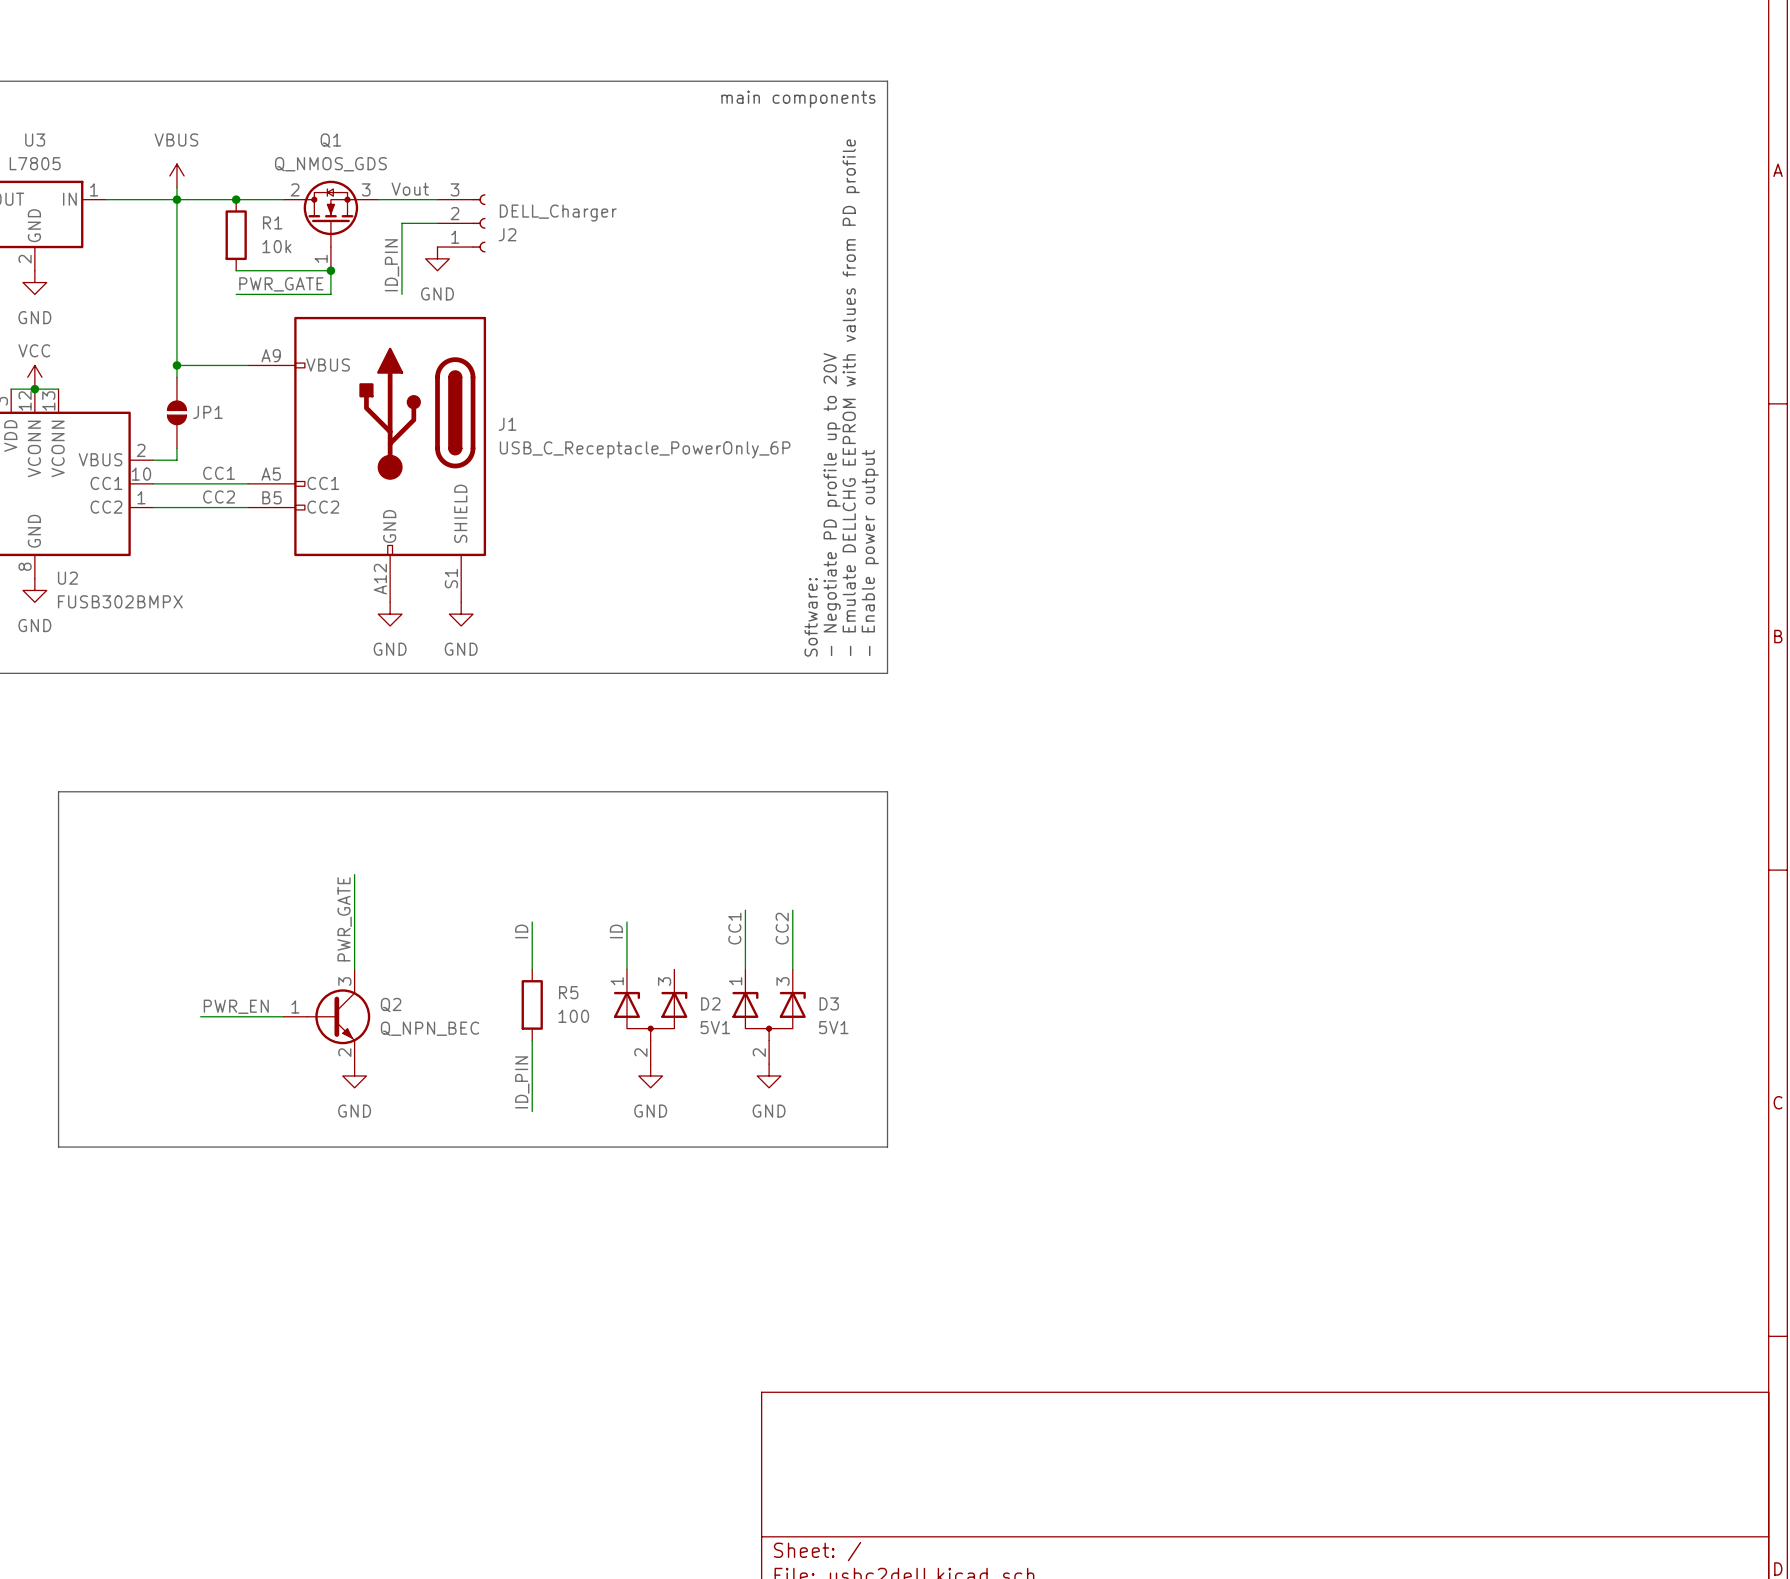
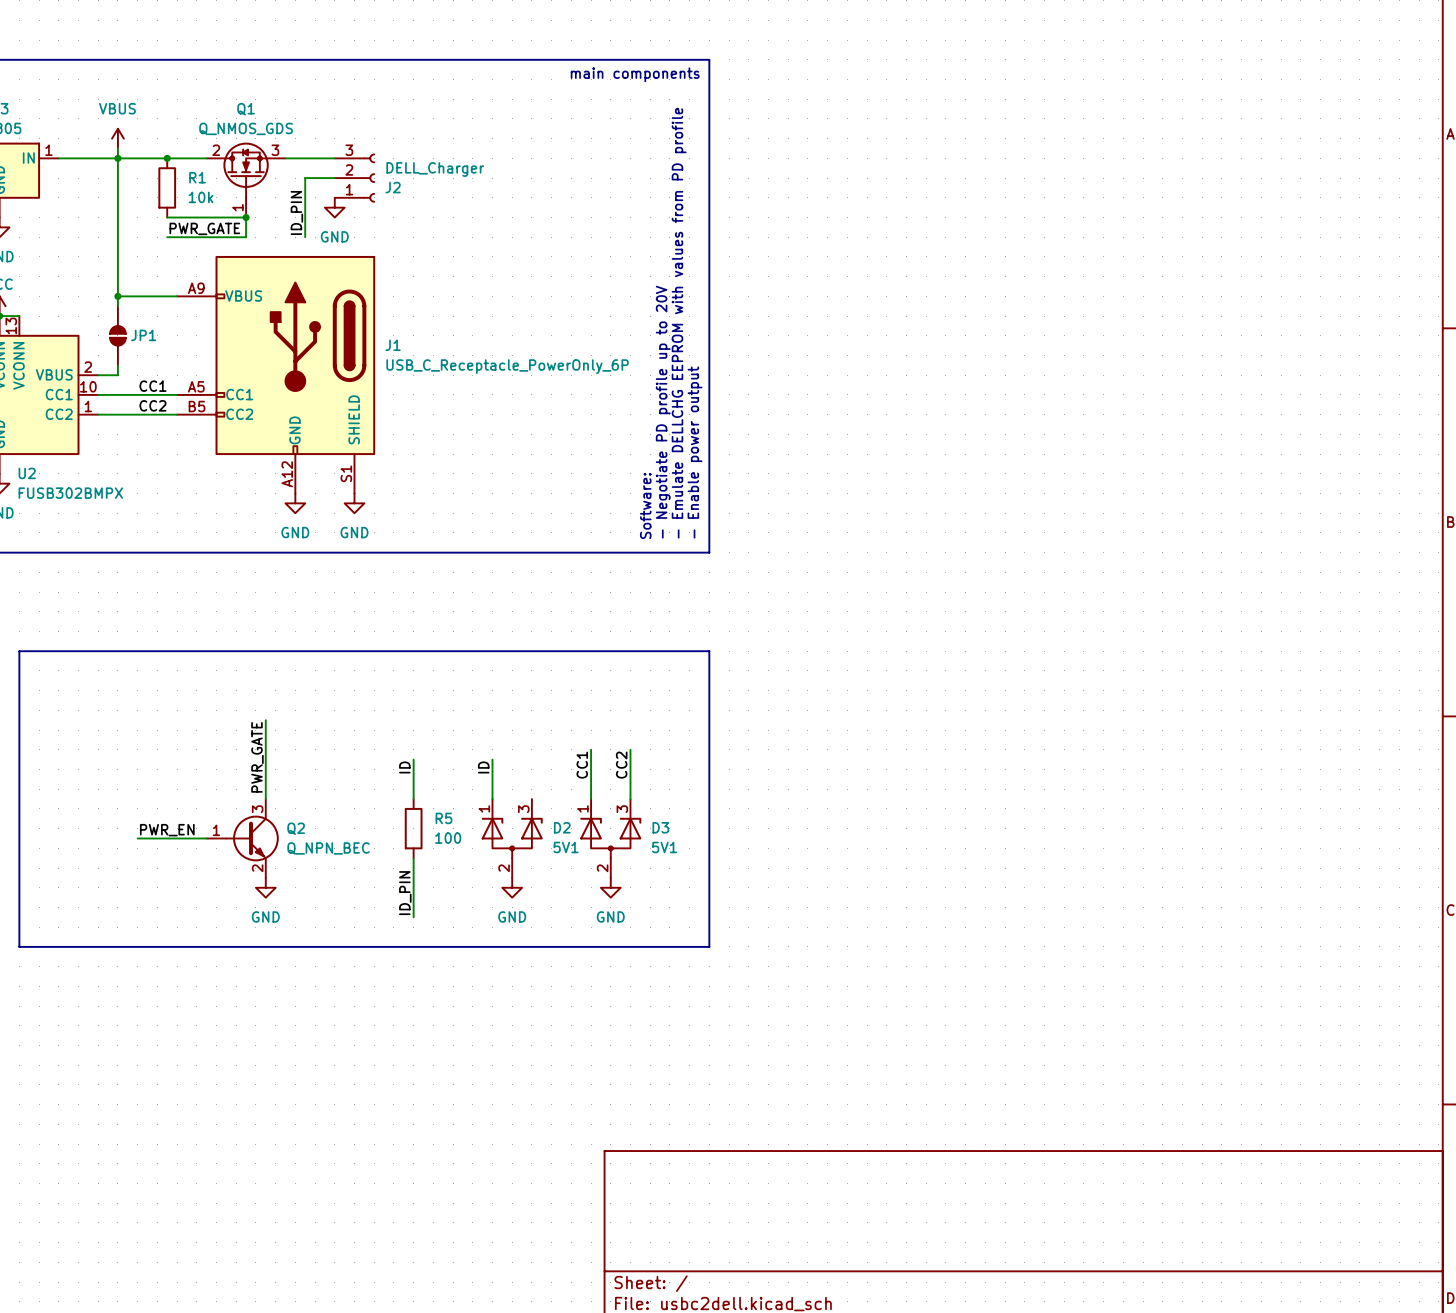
label: Vout (410, 189) -> none

